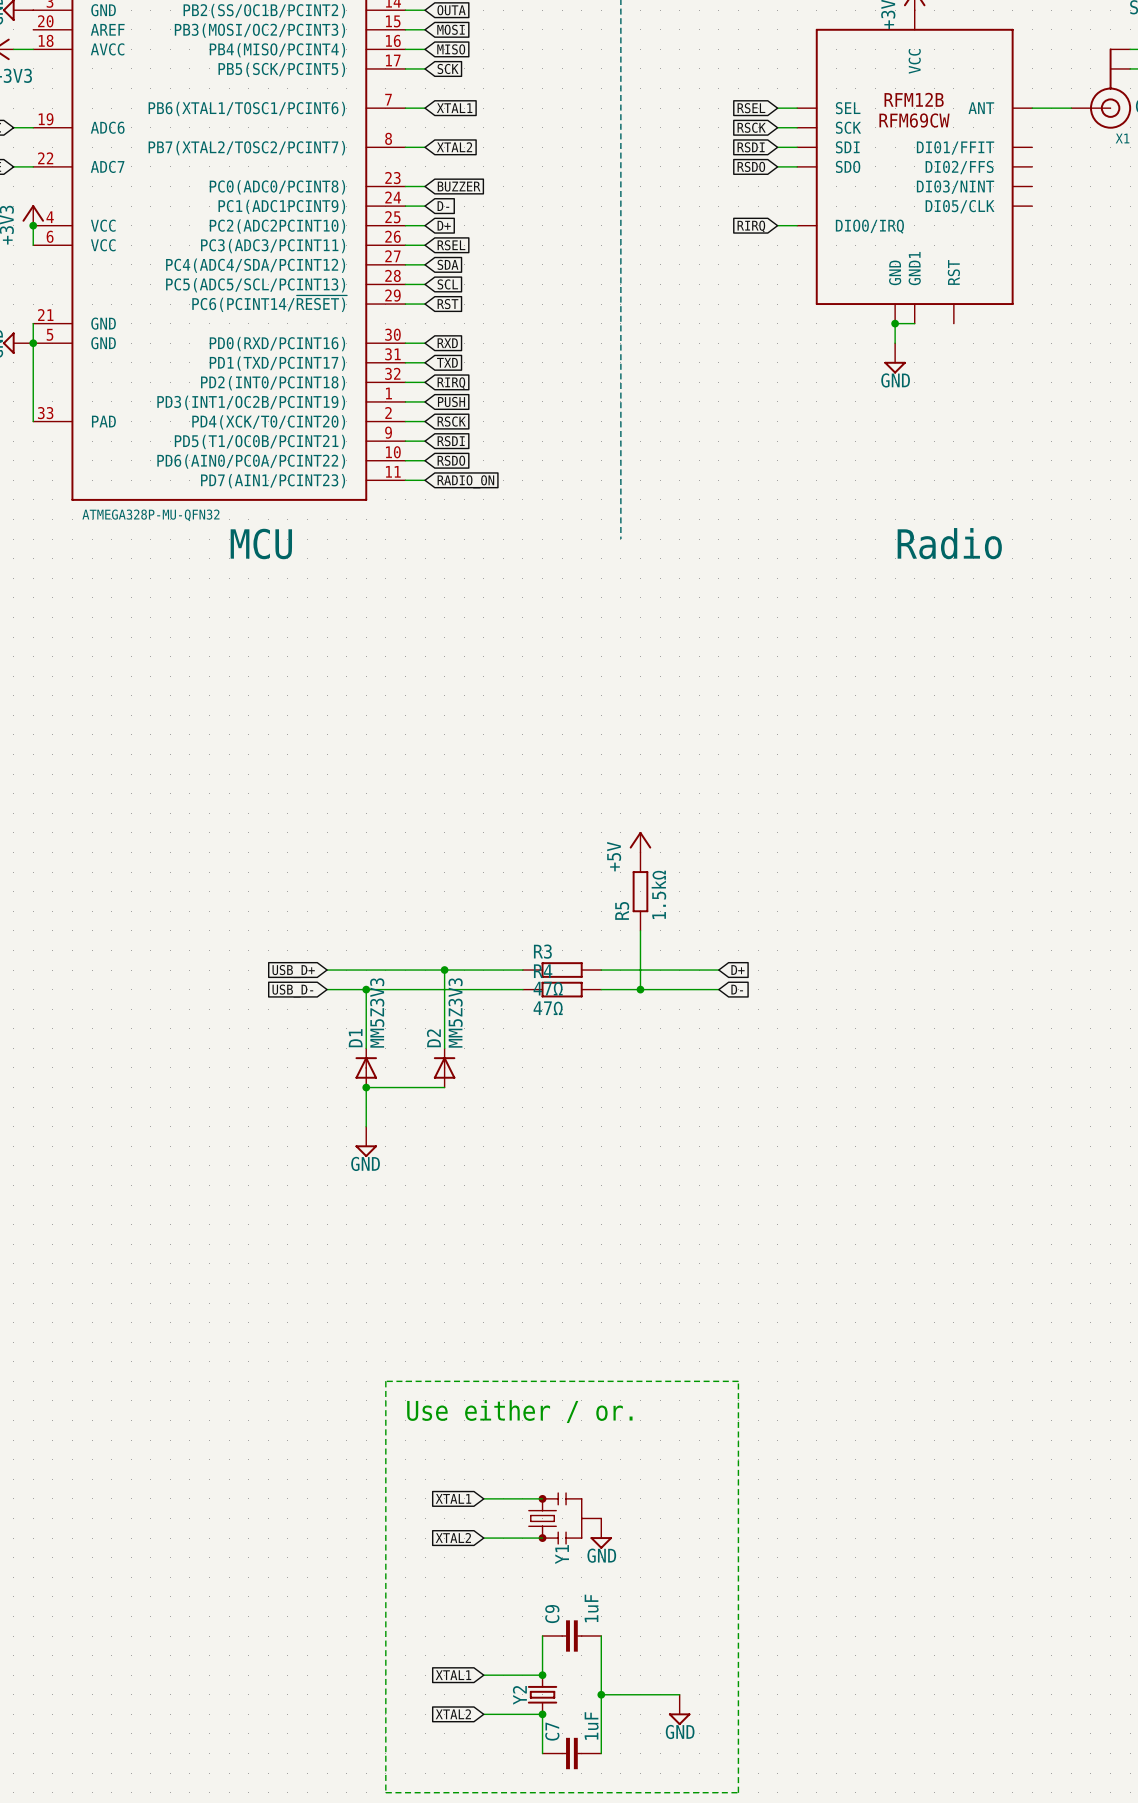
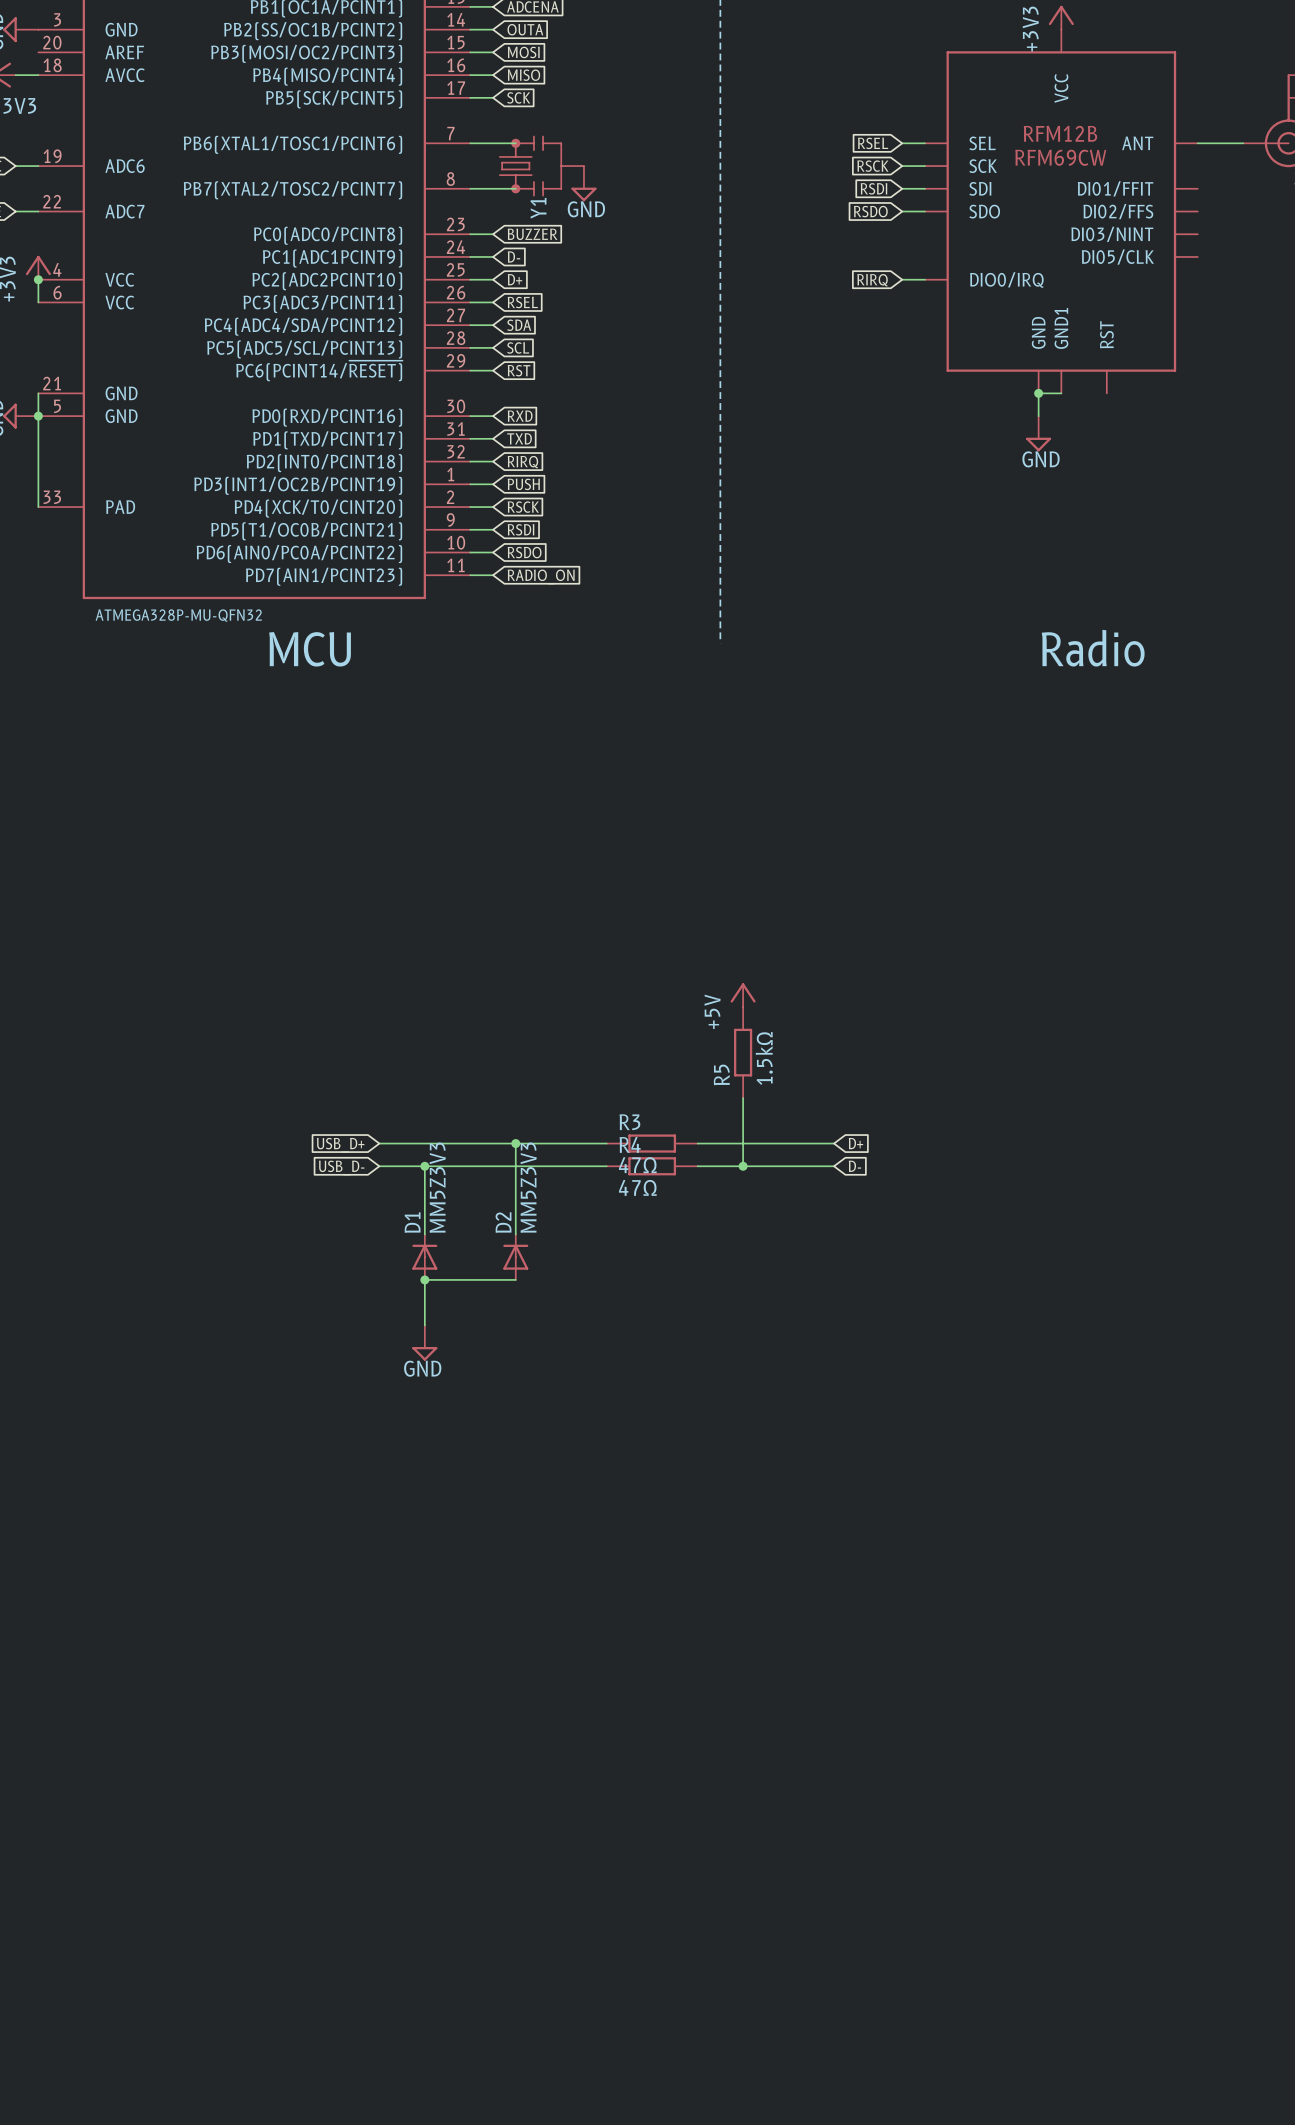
wire: none -> (493, 143) (515, 143)
global label: XTAL1 (454, 108) -> none
power symbol: none -> GND (583, 183)
wire: none -> (493, 188) (515, 188)
global label: XTAL2 (454, 147) -> none
wire: (385, 1381) (385, 1792) (738, 1792) (738, 1381) (385, 1381) -> none
text: Use either / or. (519, 1411) -> none
global label: XTAL1 (453, 1498) -> none
wire: (483, 1498) (542, 1498) -> none
Y1 position: (565, 1518) -> (541, 166)
power symbol: GND (601, 1533) -> none
global label: XTAL2 (453, 1537) -> none
wire: (483, 1538) (542, 1538) -> none
wire: (542, 1636) (542, 1675) (483, 1675) -> none
C9: 1uF (571, 1636) -> none
wire: (601, 1636) (601, 1753) -> none
global label: XTAL1 (453, 1675) -> none
junction: (542, 1675) -> none
Y2: (542, 1694) -> none
wire: (601, 1694) (679, 1694) -> none
junction: (601, 1694) -> none
power symbol: GND (679, 1709) -> none
global label: XTAL2 (453, 1714) -> none
wire: (483, 1714) (542, 1714) (542, 1753) -> none
junction: (542, 1714) -> none
C7: 1uF (571, 1753) -> none

